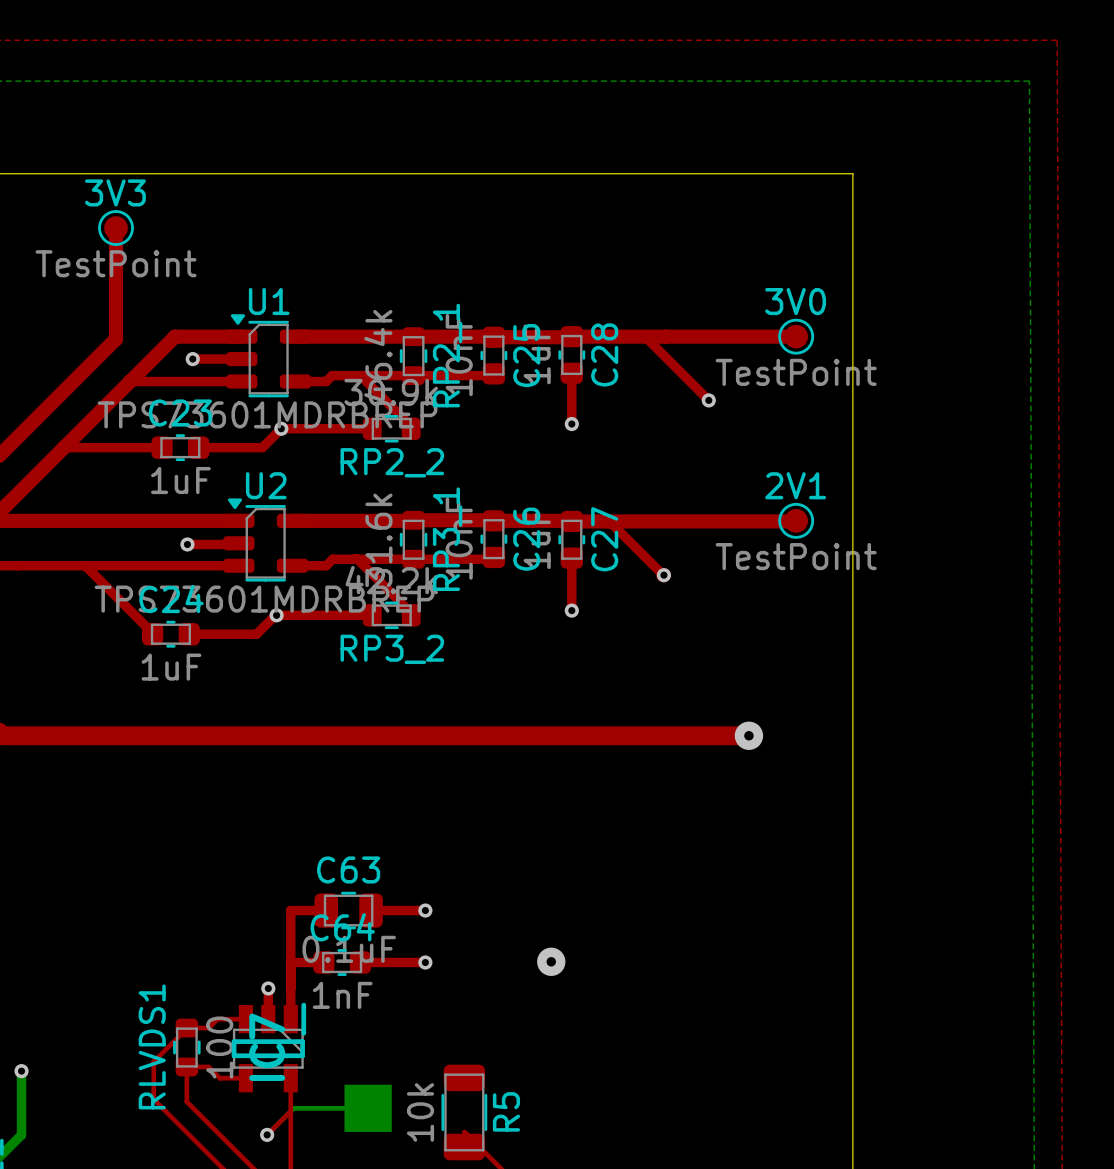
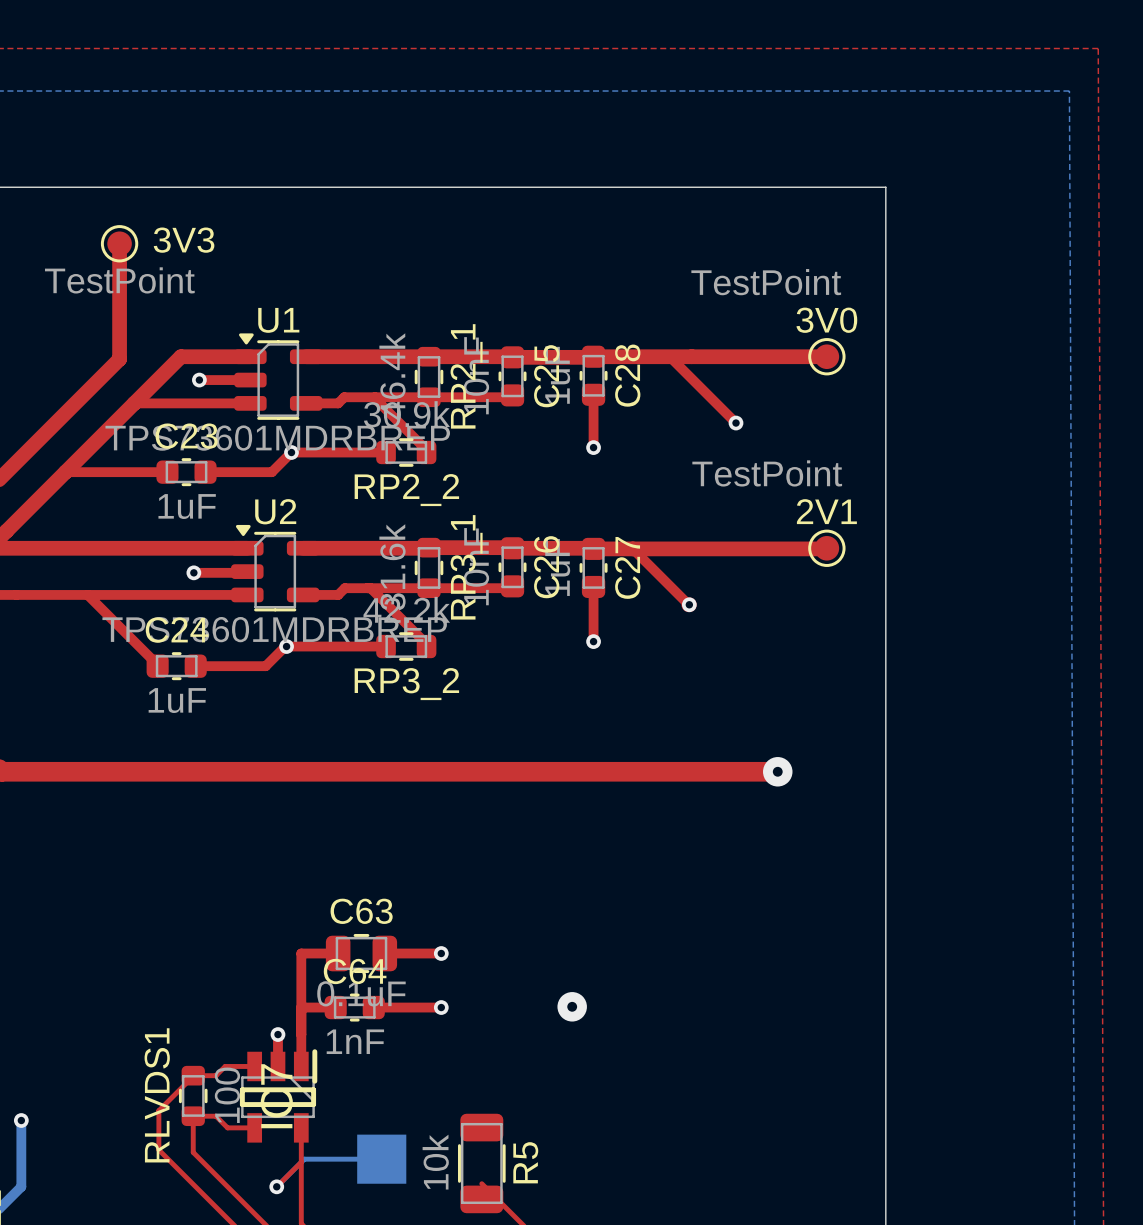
3V3 name position: 3V3 (115, 192) -> 3V3 (184, 240)
3V0 value position: TestPoint (796, 372) -> TestPoint (766, 282)
2V1 value position: TestPoint (796, 556) -> TestPoint (767, 473)

